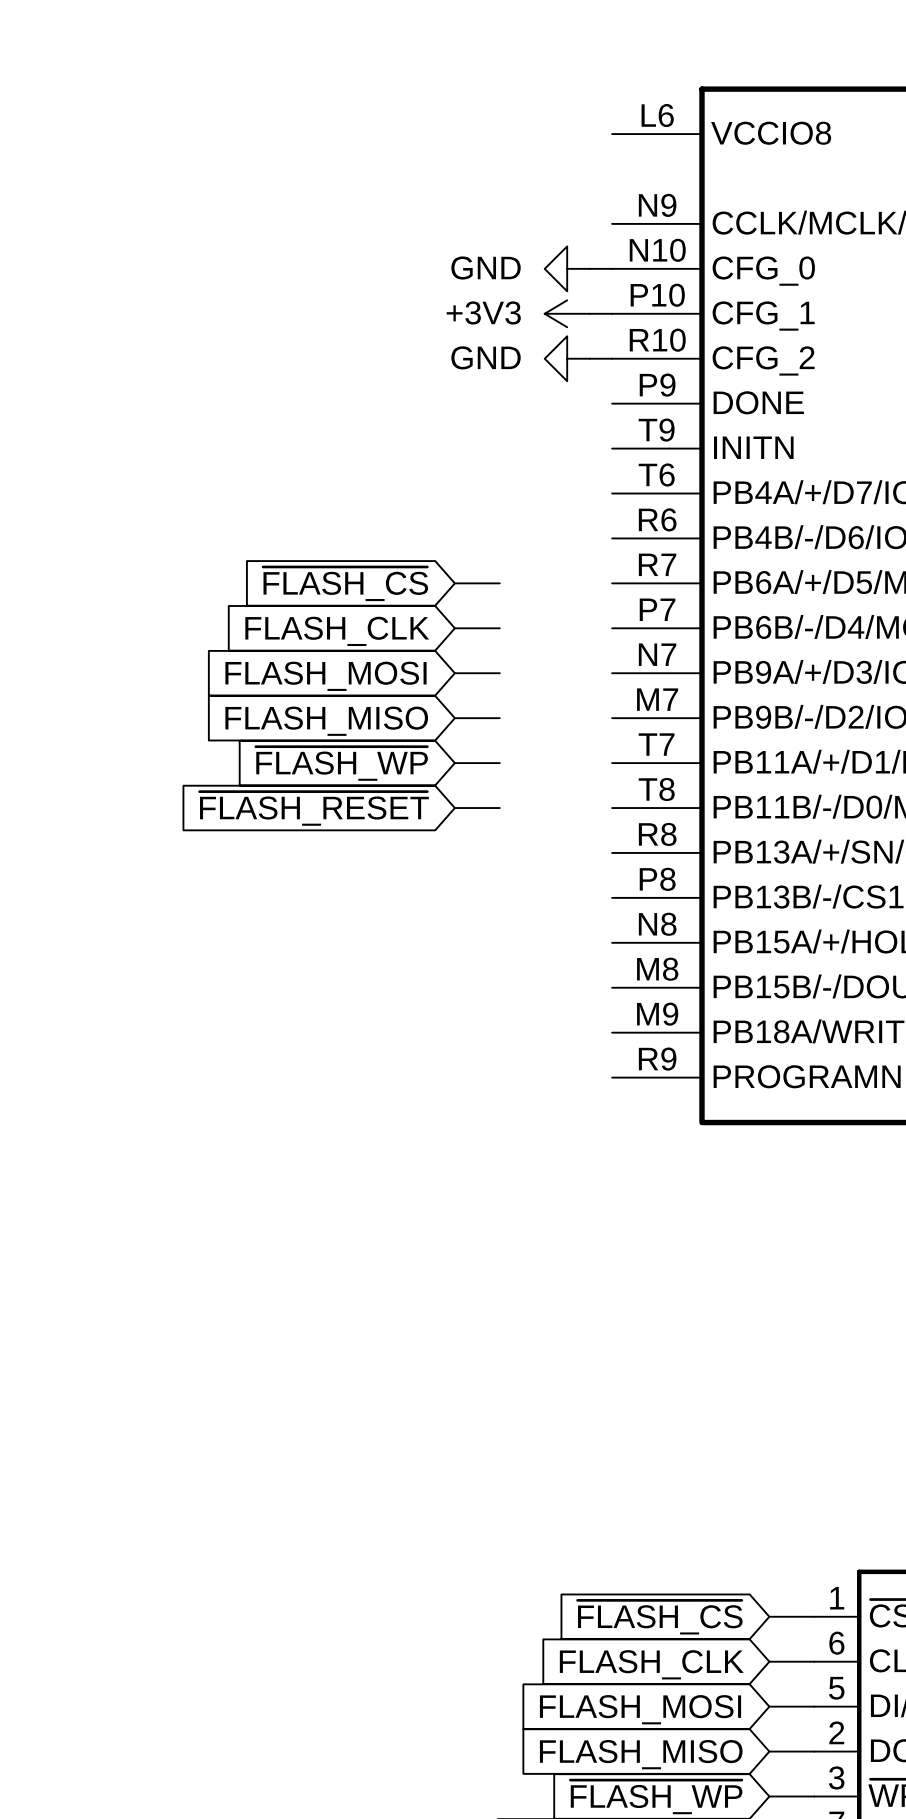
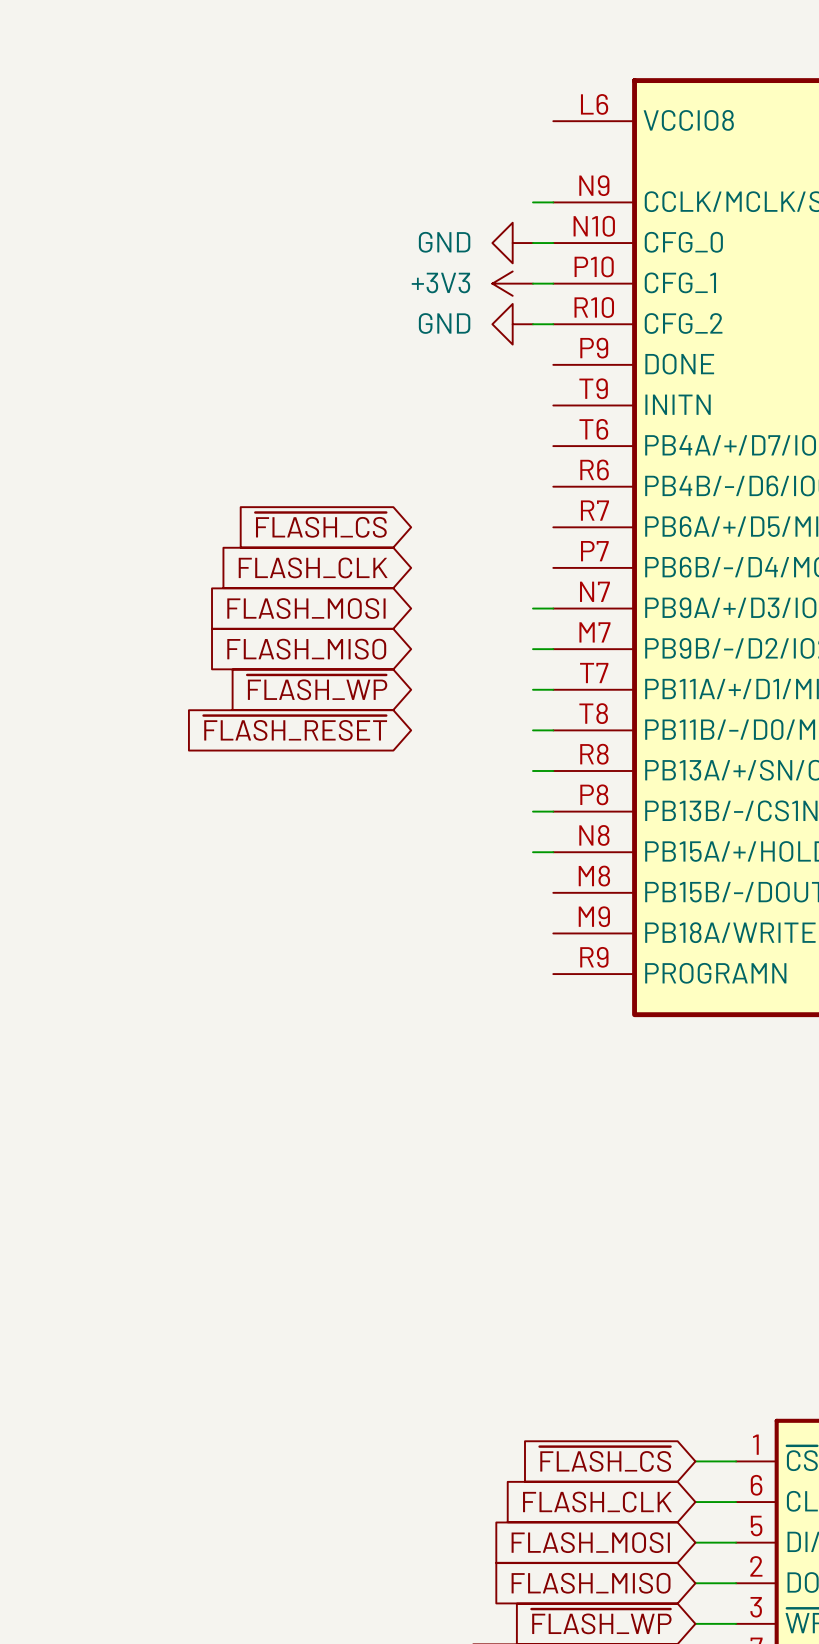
wire: none -> (533, 202) (553, 202)
wire: (454, 583) (499, 583) -> none
wire: (454, 628) (499, 628) -> none
wire: (454, 673) (499, 673) -> none
wire: none -> (533, 608) (553, 608)
wire: (454, 718) (499, 718) -> none
wire: none -> (533, 649) (553, 649)
wire: (454, 763) (499, 763) -> none
wire: none -> (533, 689) (553, 689)
wire: (454, 808) (499, 808) -> none
wire: none -> (533, 730) (553, 730)
wire: none -> (533, 771) (553, 771)
wire: none -> (533, 811) (553, 811)
wire: none -> (533, 852) (553, 852)

